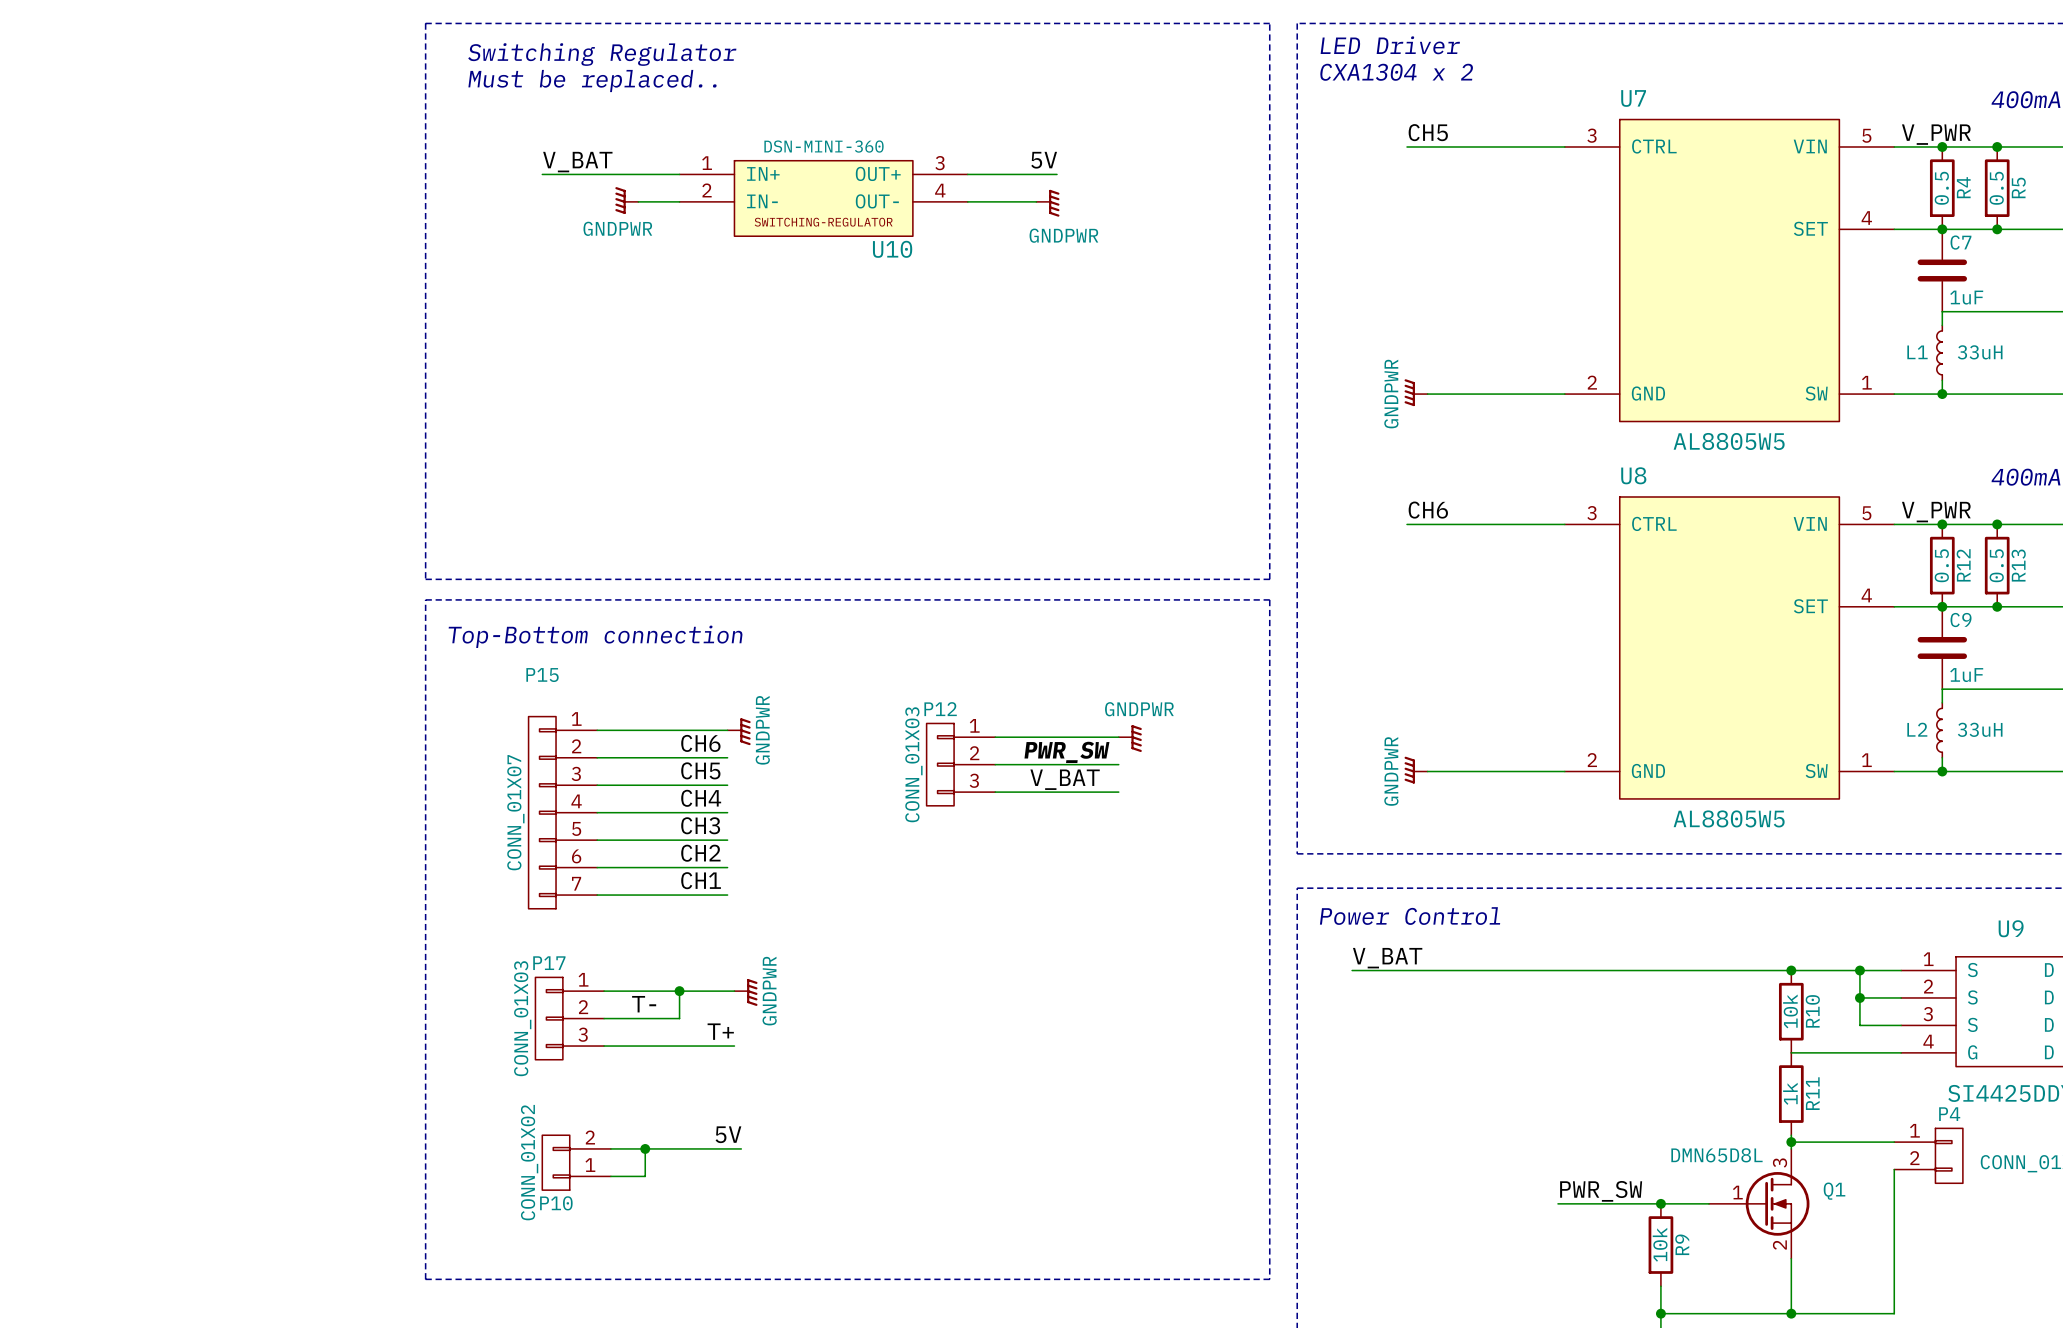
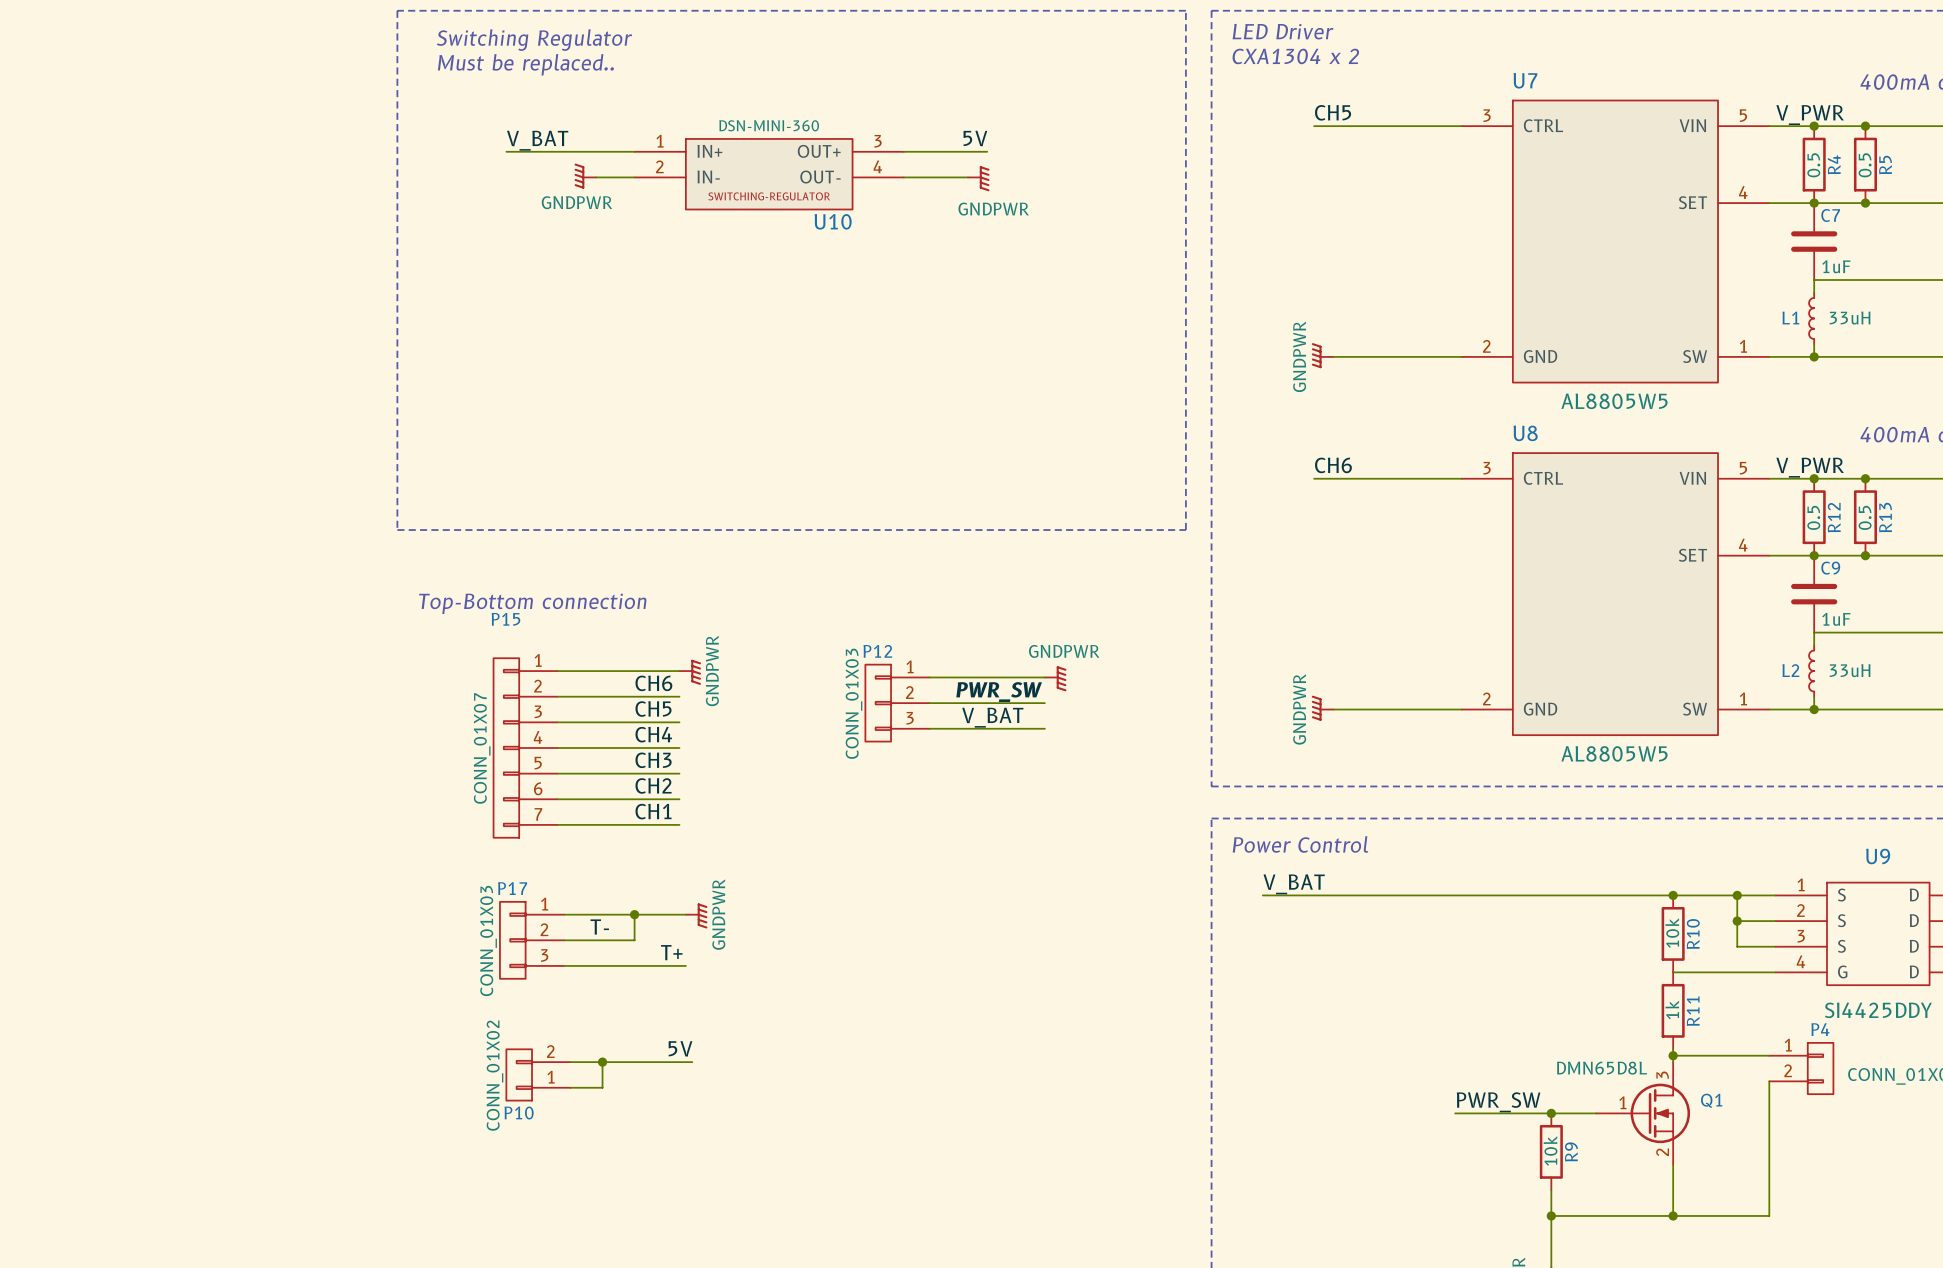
line: (425, 599) (1269, 599) (1269, 1279) (425, 1279) (425, 599) -> none
text position: Top-Bottom connection (595, 636) -> Top-Bottom connection (532, 603)

